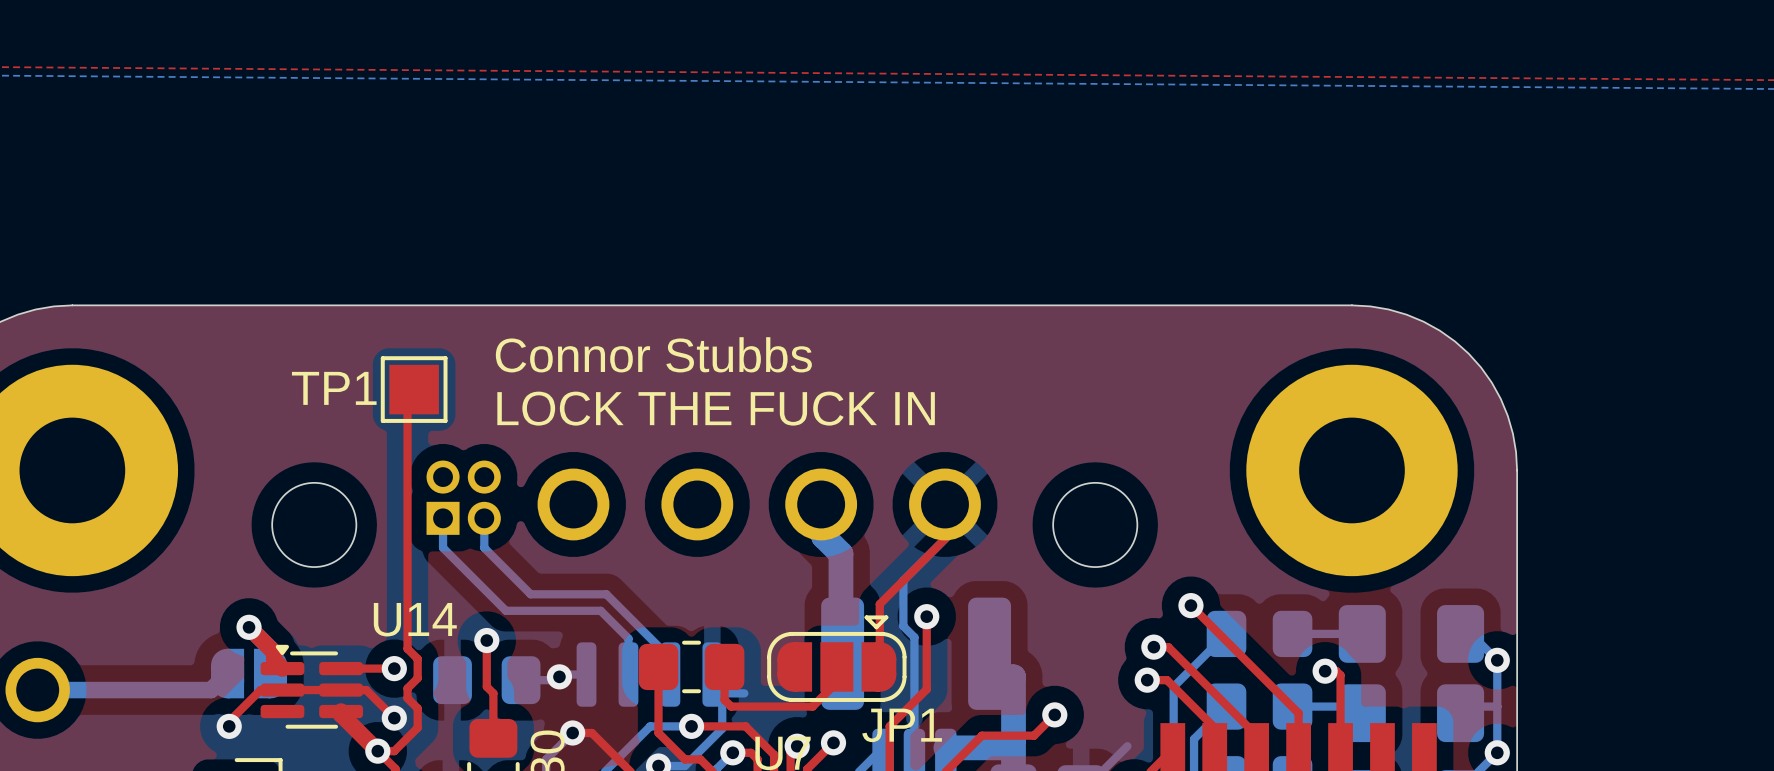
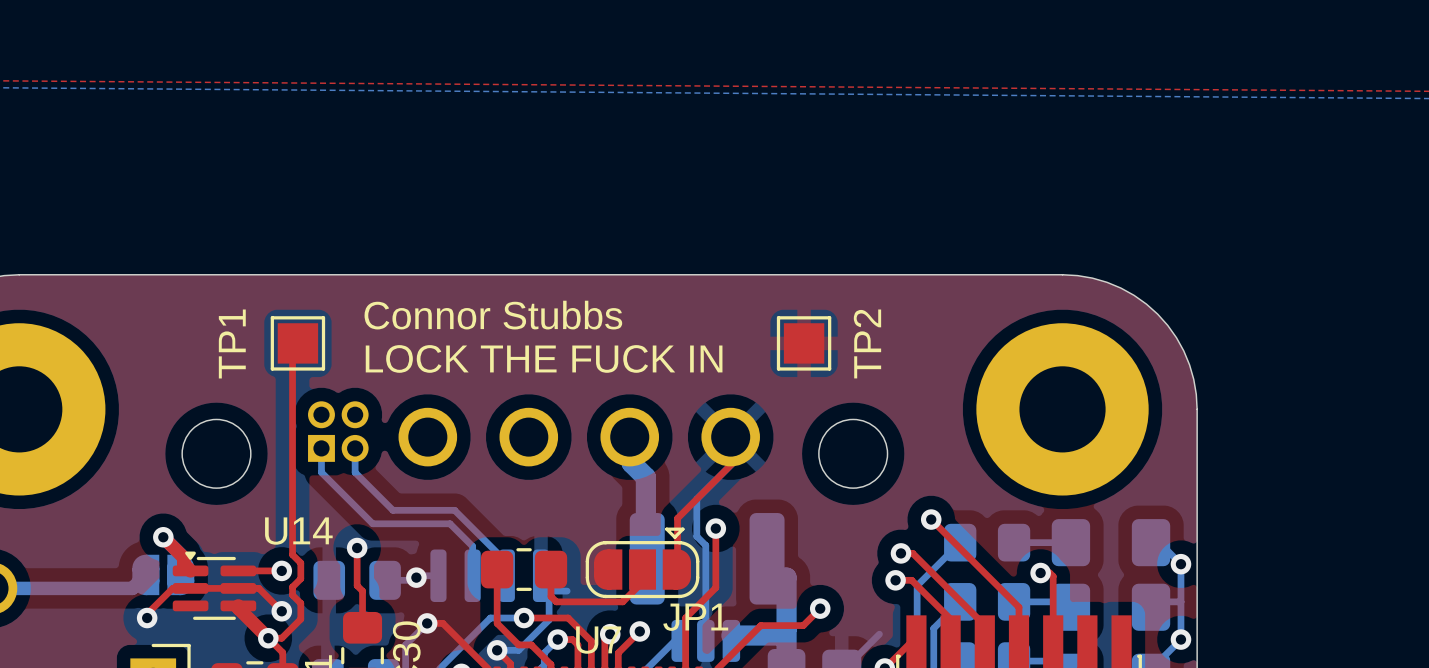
TP1 name rotation: 0° (334, 388) -> 90° counterclockwise (232, 343)
TP2: none -> (804, 343)

